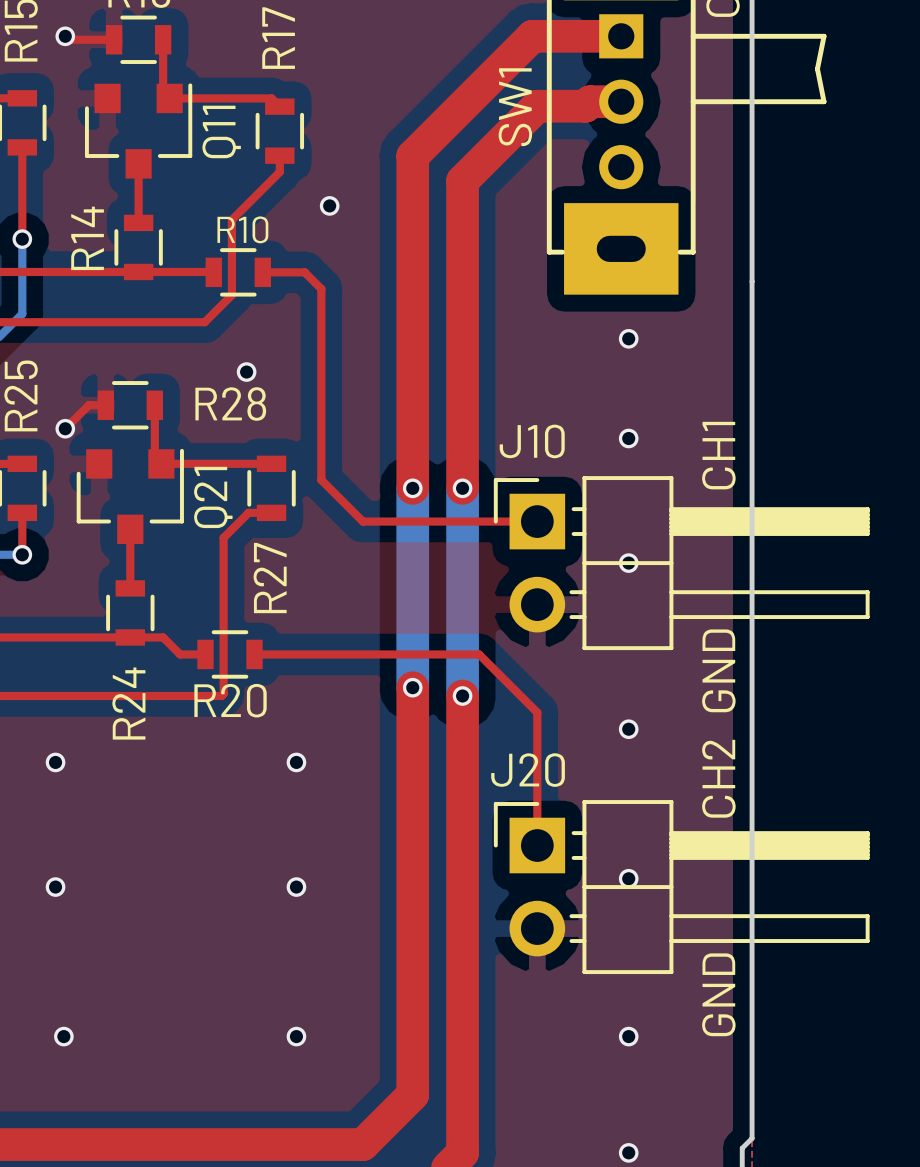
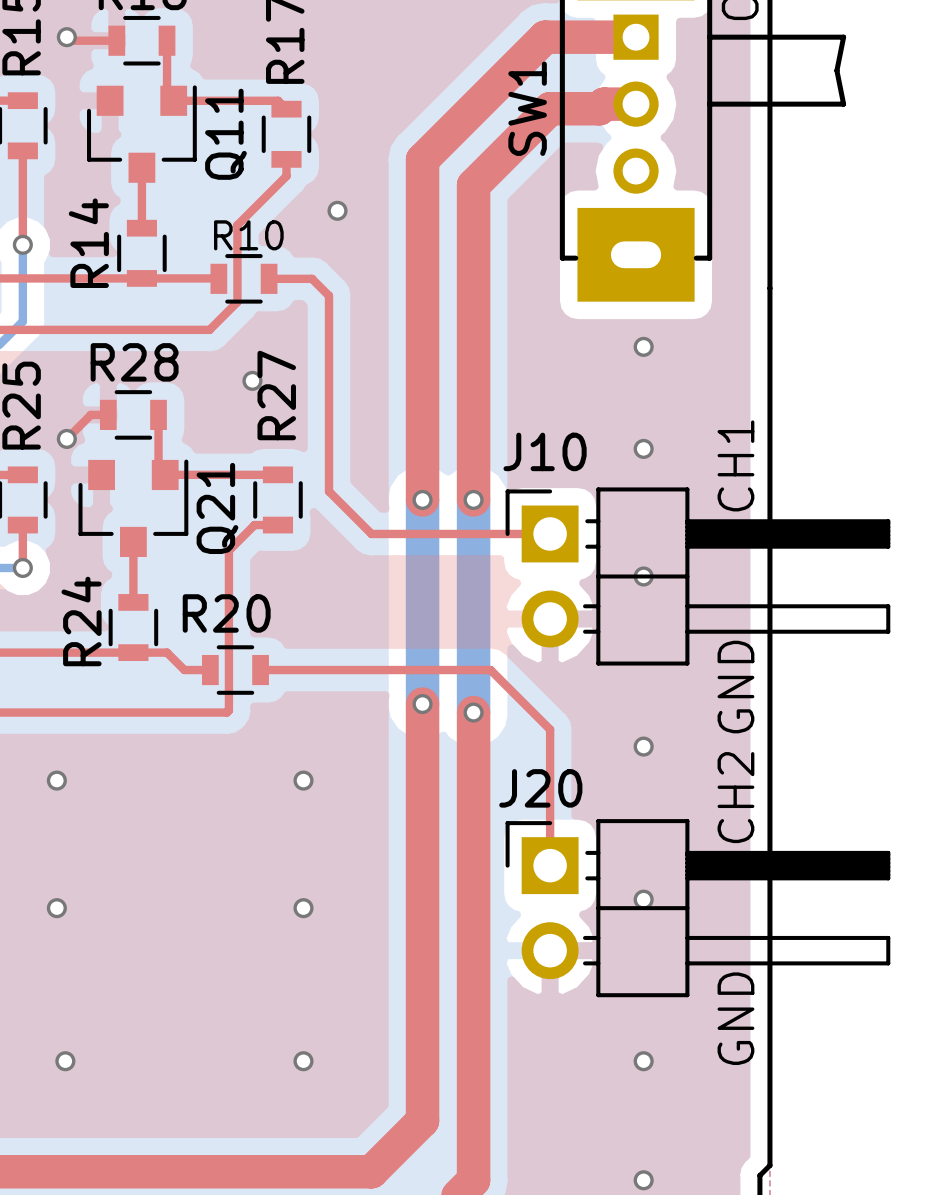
R28 name position: R28 (230, 404) -> R28 (134, 362)
R27 name position: R27 (270, 578) -> R27 (276, 395)
R20 name position: R20 (230, 700) -> R20 (226, 613)
R24 name position: R24 (128, 703) -> R24 (81, 621)

